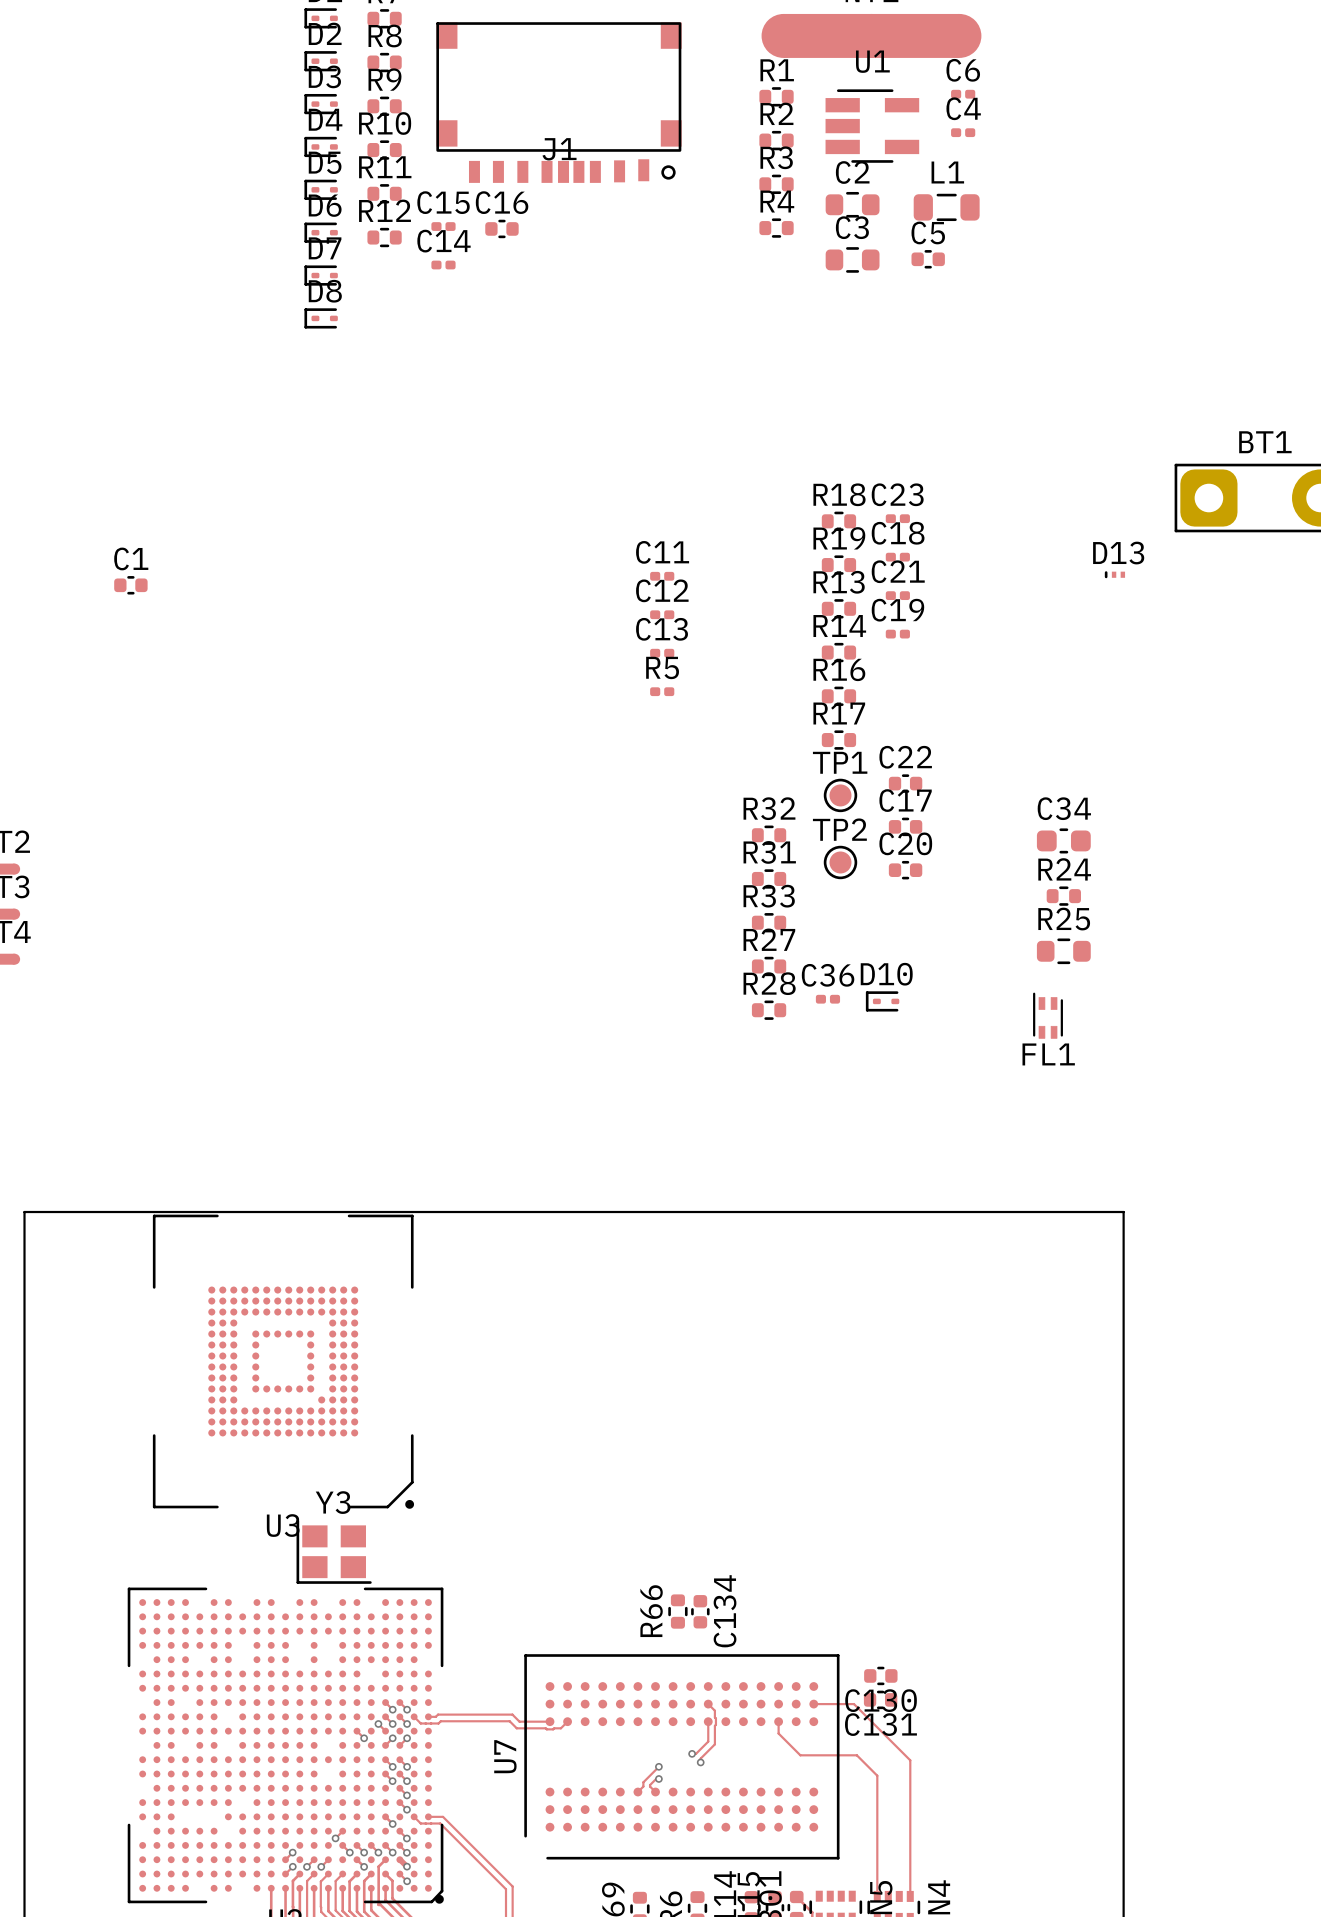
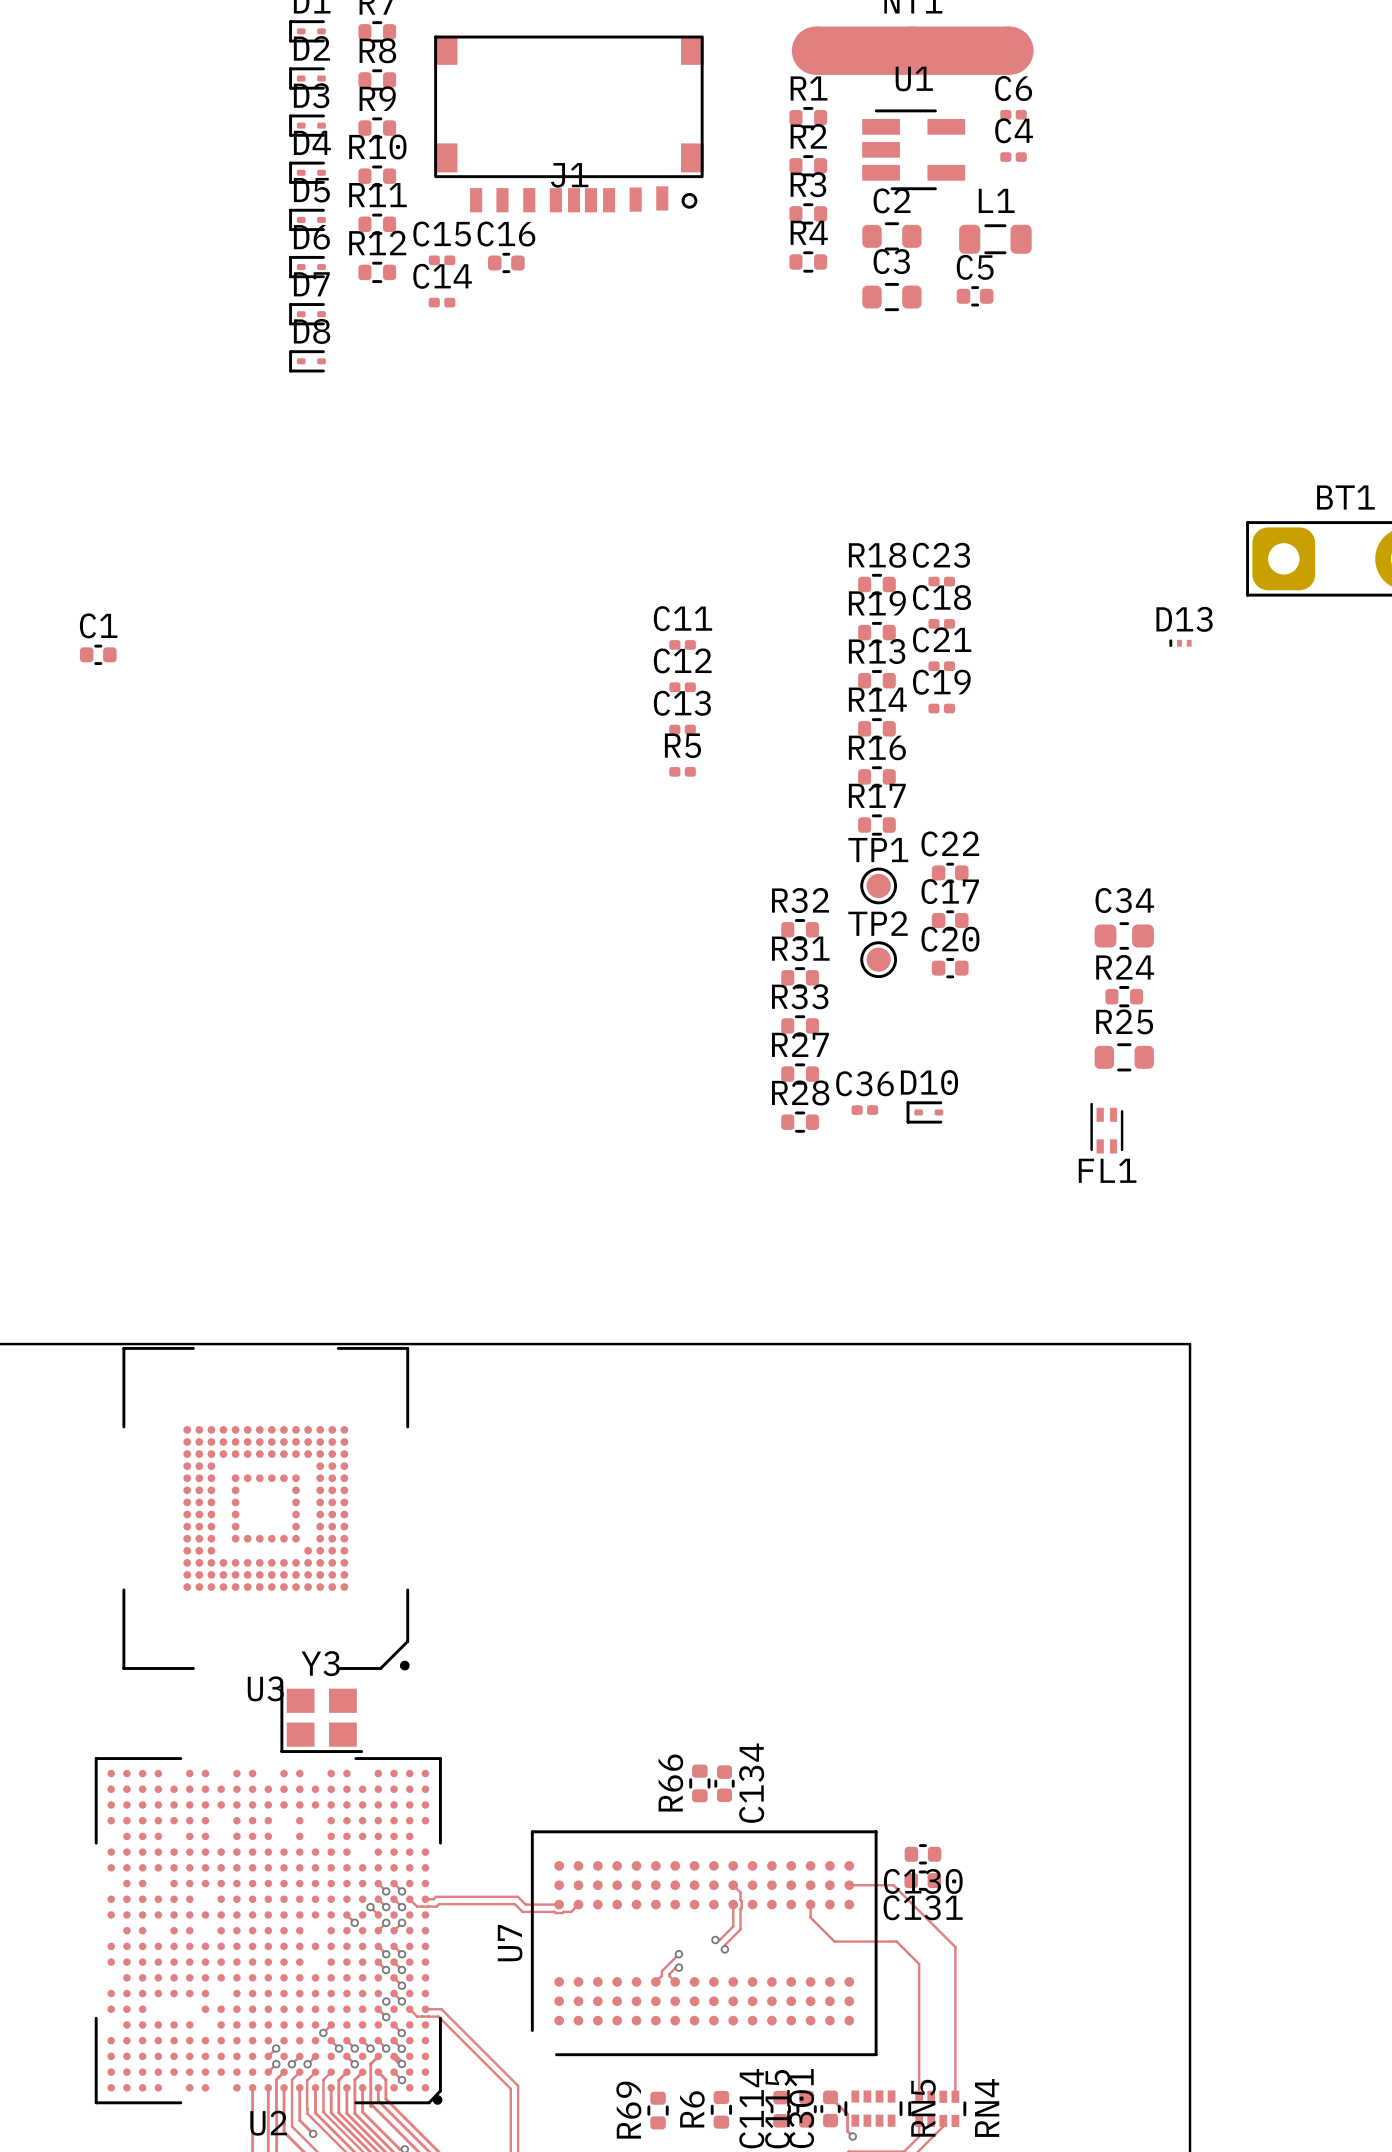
via: none -> (386, 2001)

